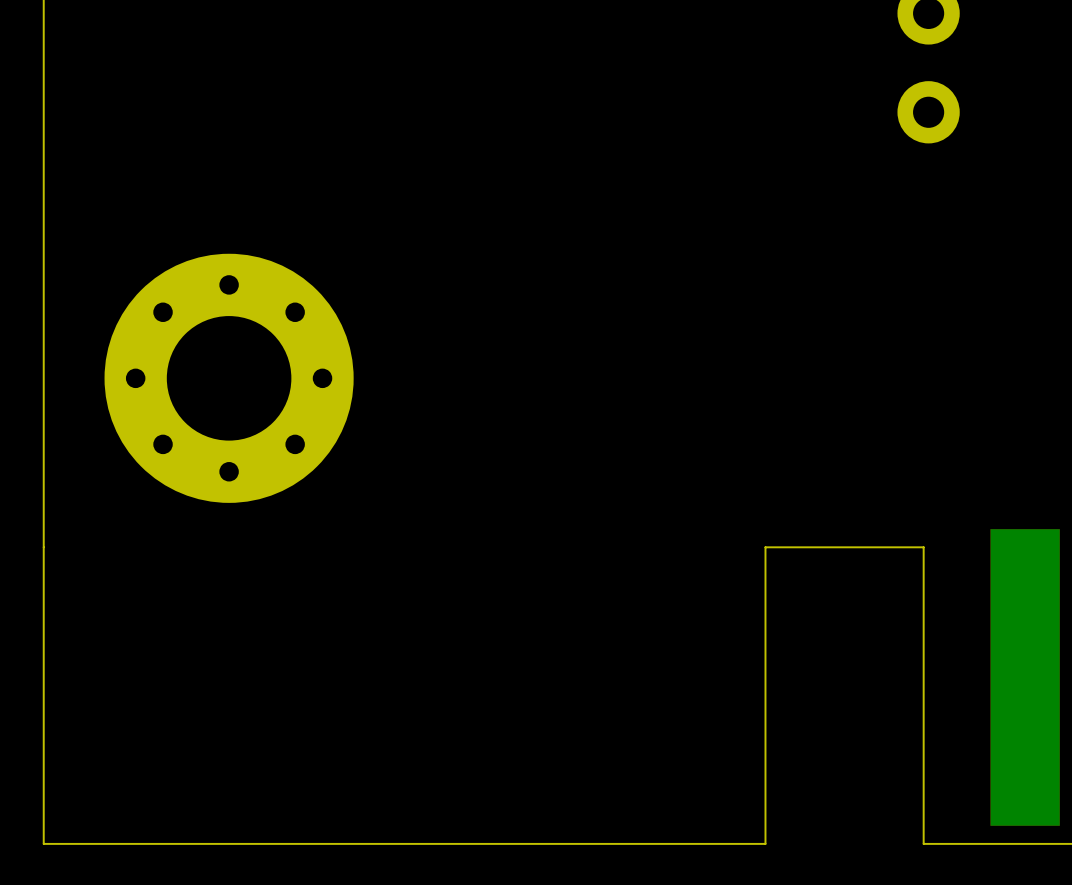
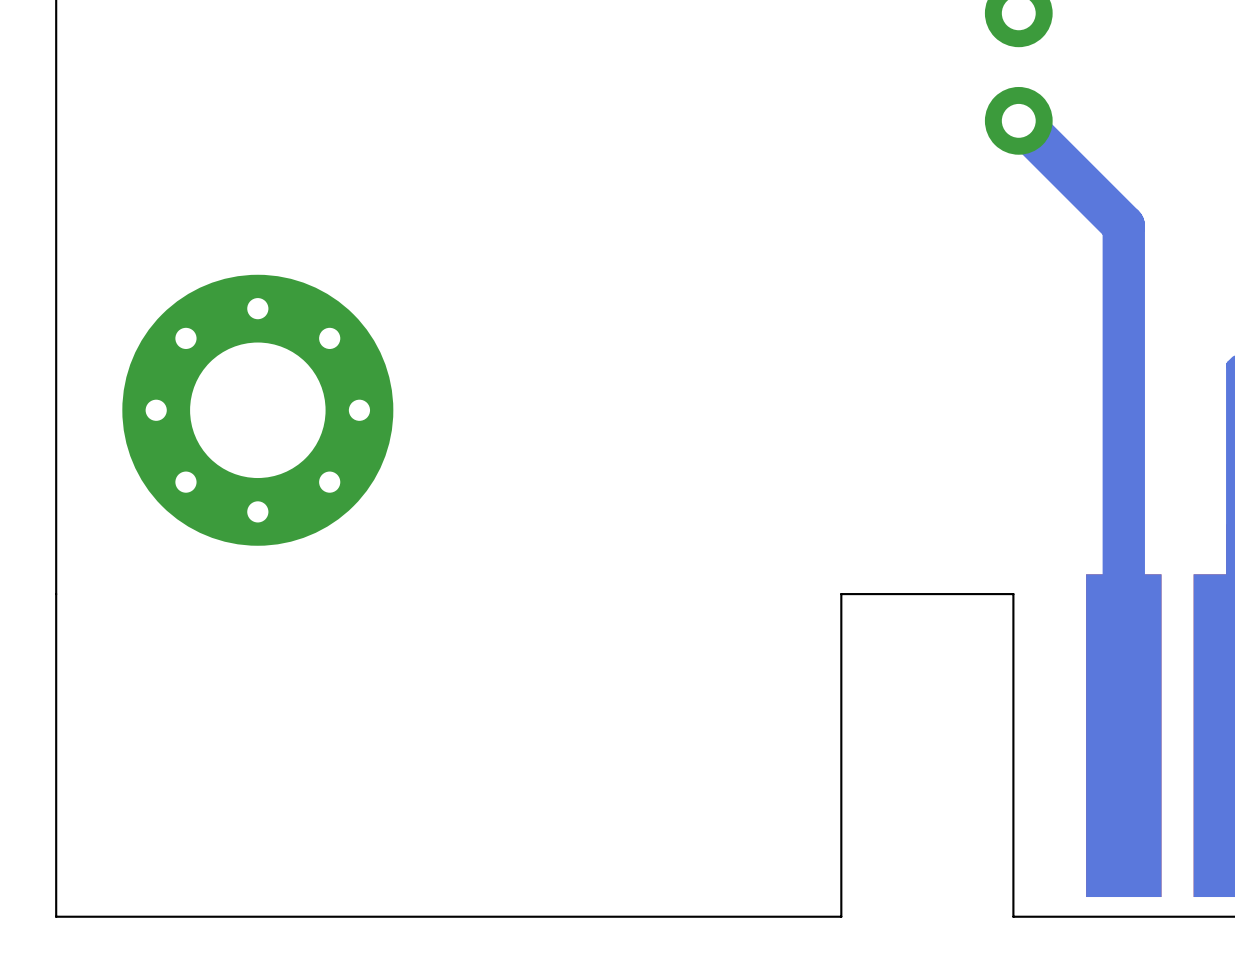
bottom track: none -> (1018, 120) (1123, 225) (1123, 735)

